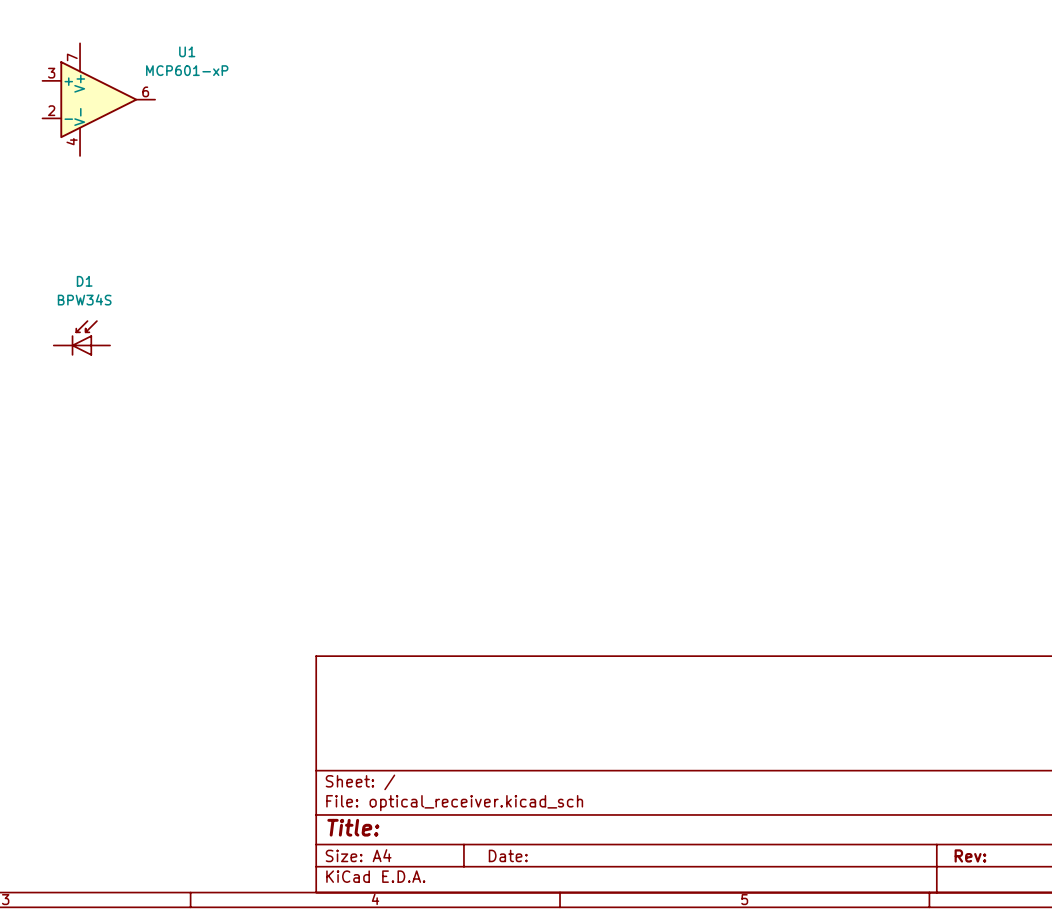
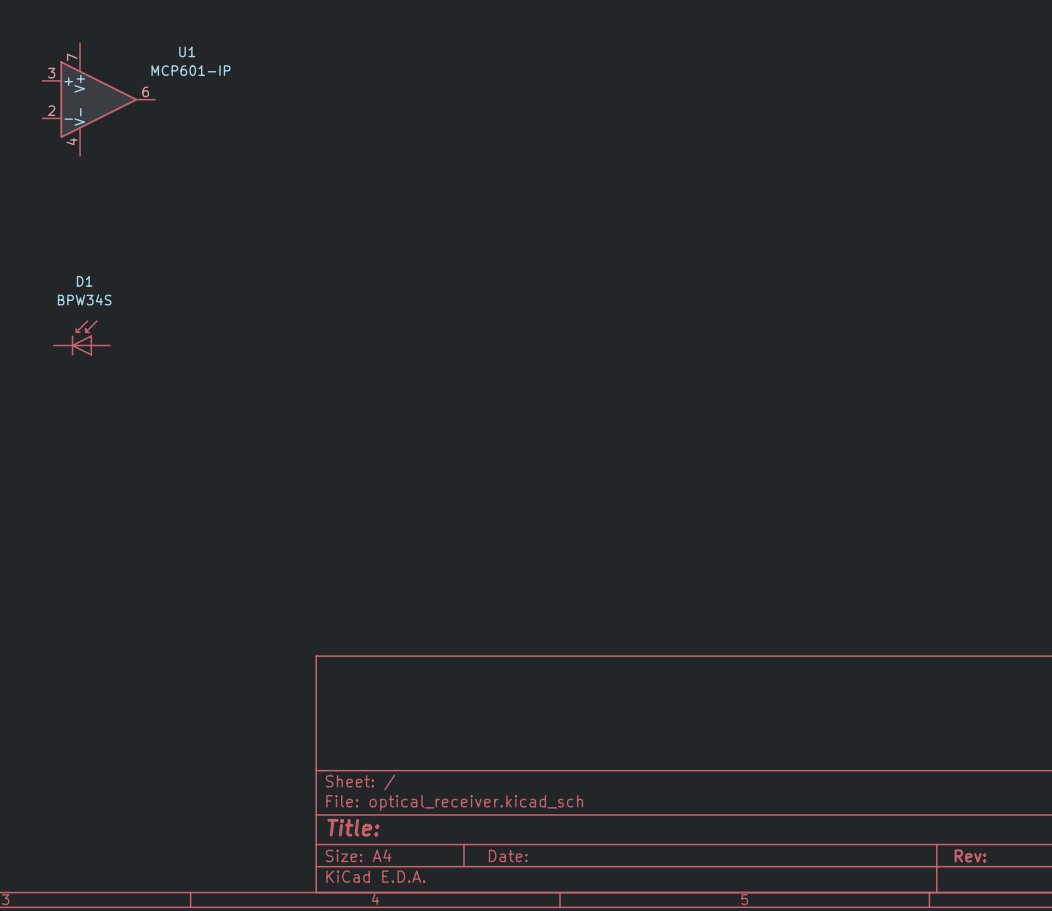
U1 value: MCP601-xP (187, 70) -> MCP601-IP (190, 70)

